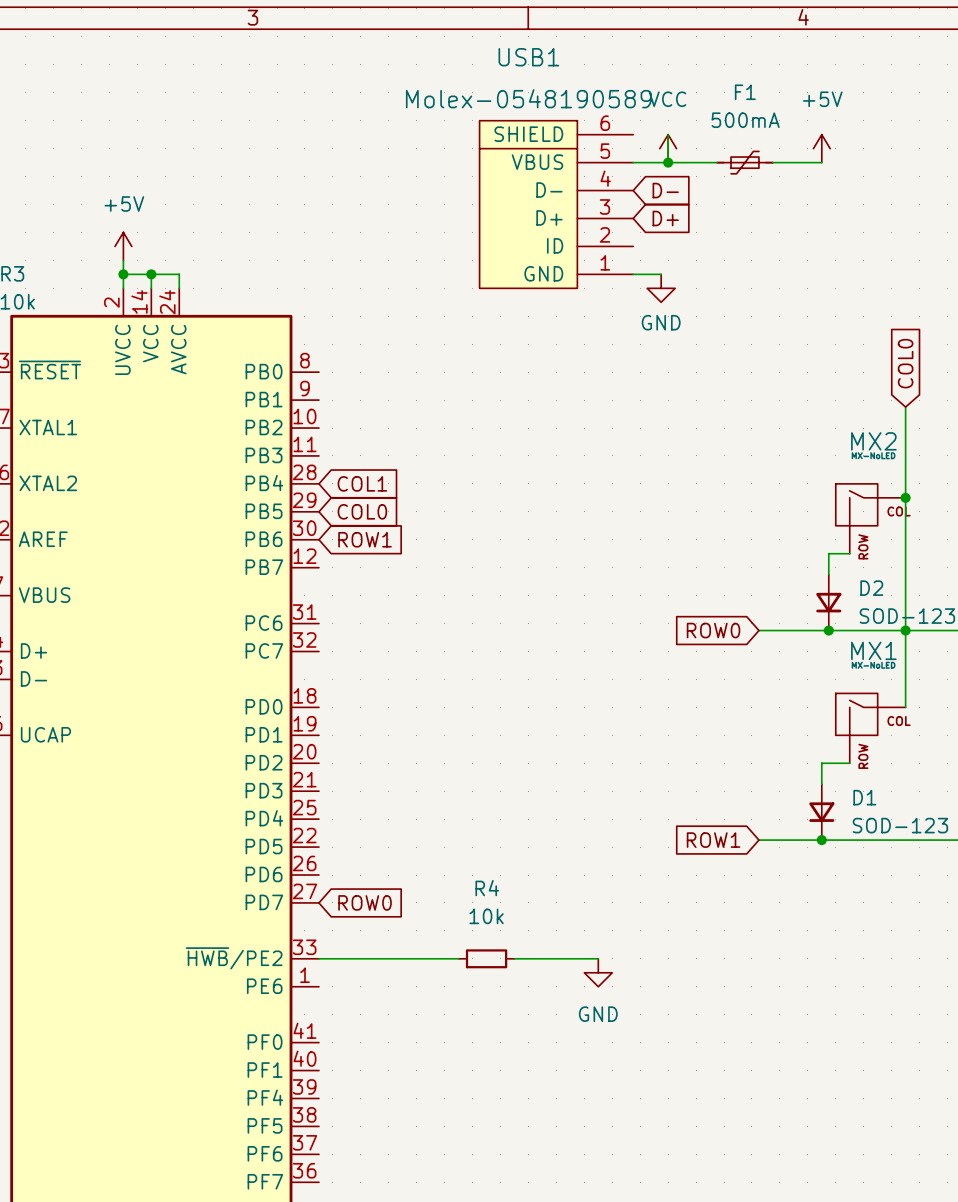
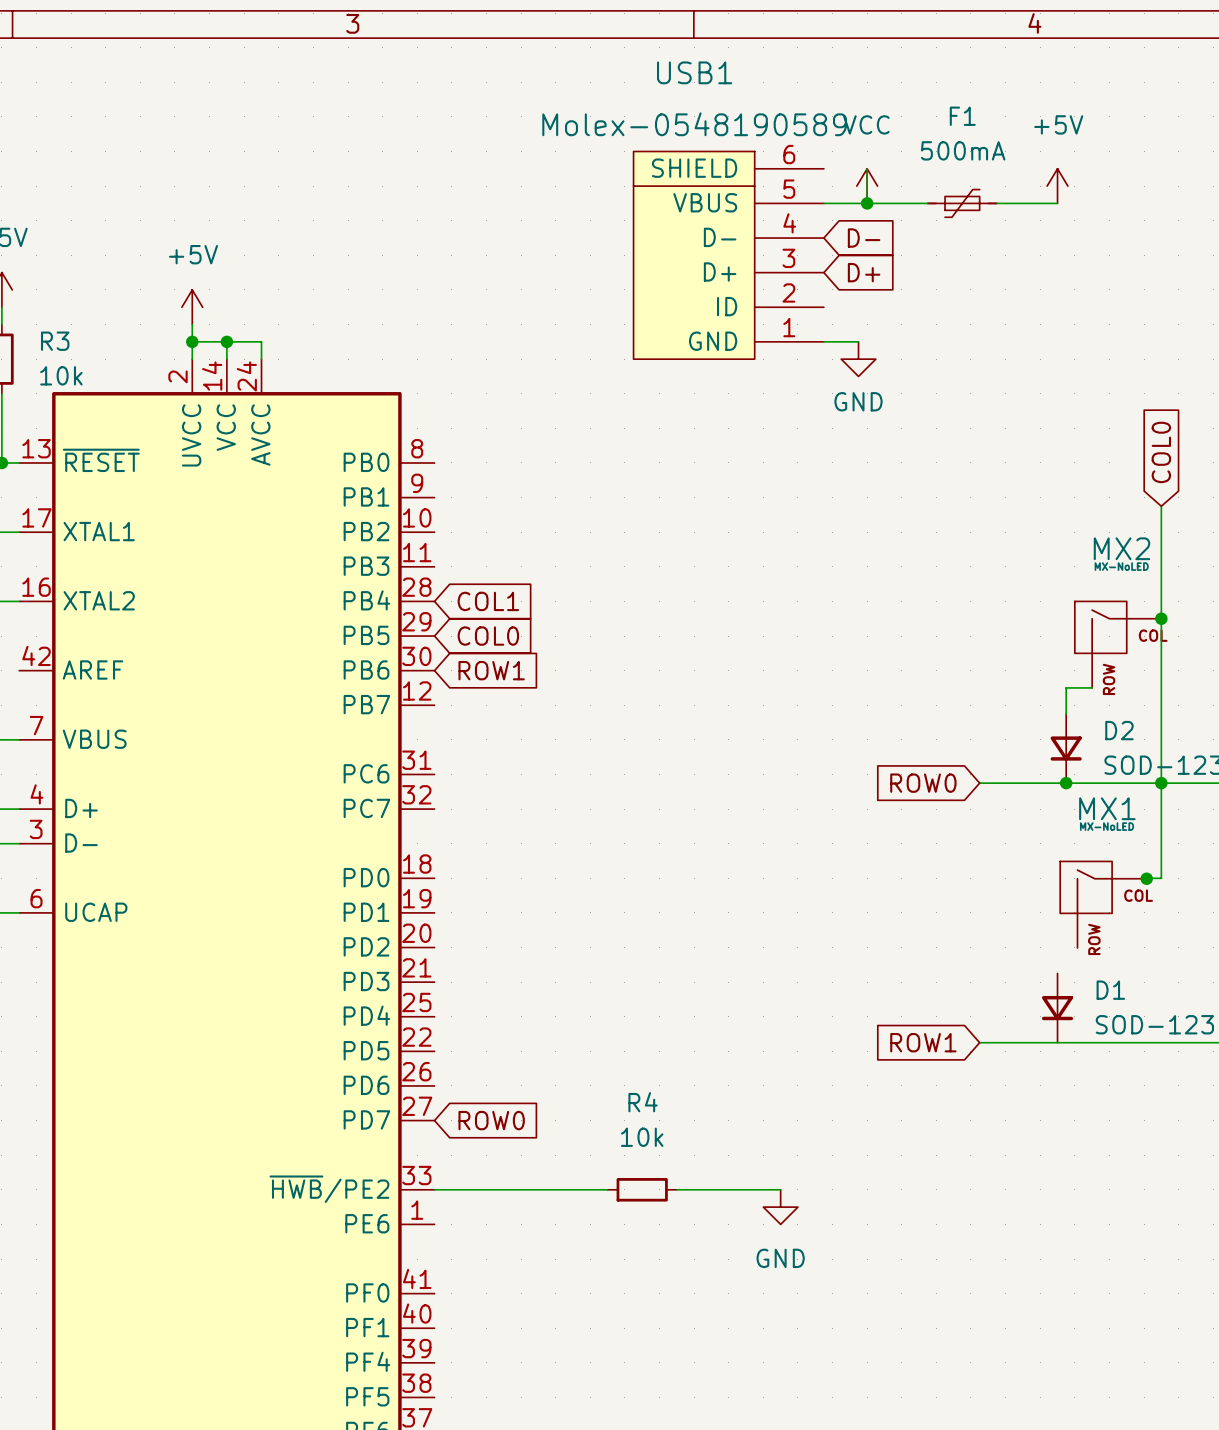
MX1 symbol: [835, 693, 906, 764] -> [1060, 861, 1147, 948]
junction: none -> (1146, 878)
wire: (849, 763) (821, 763) (821, 784) -> none
junction: (821, 840) -> none

